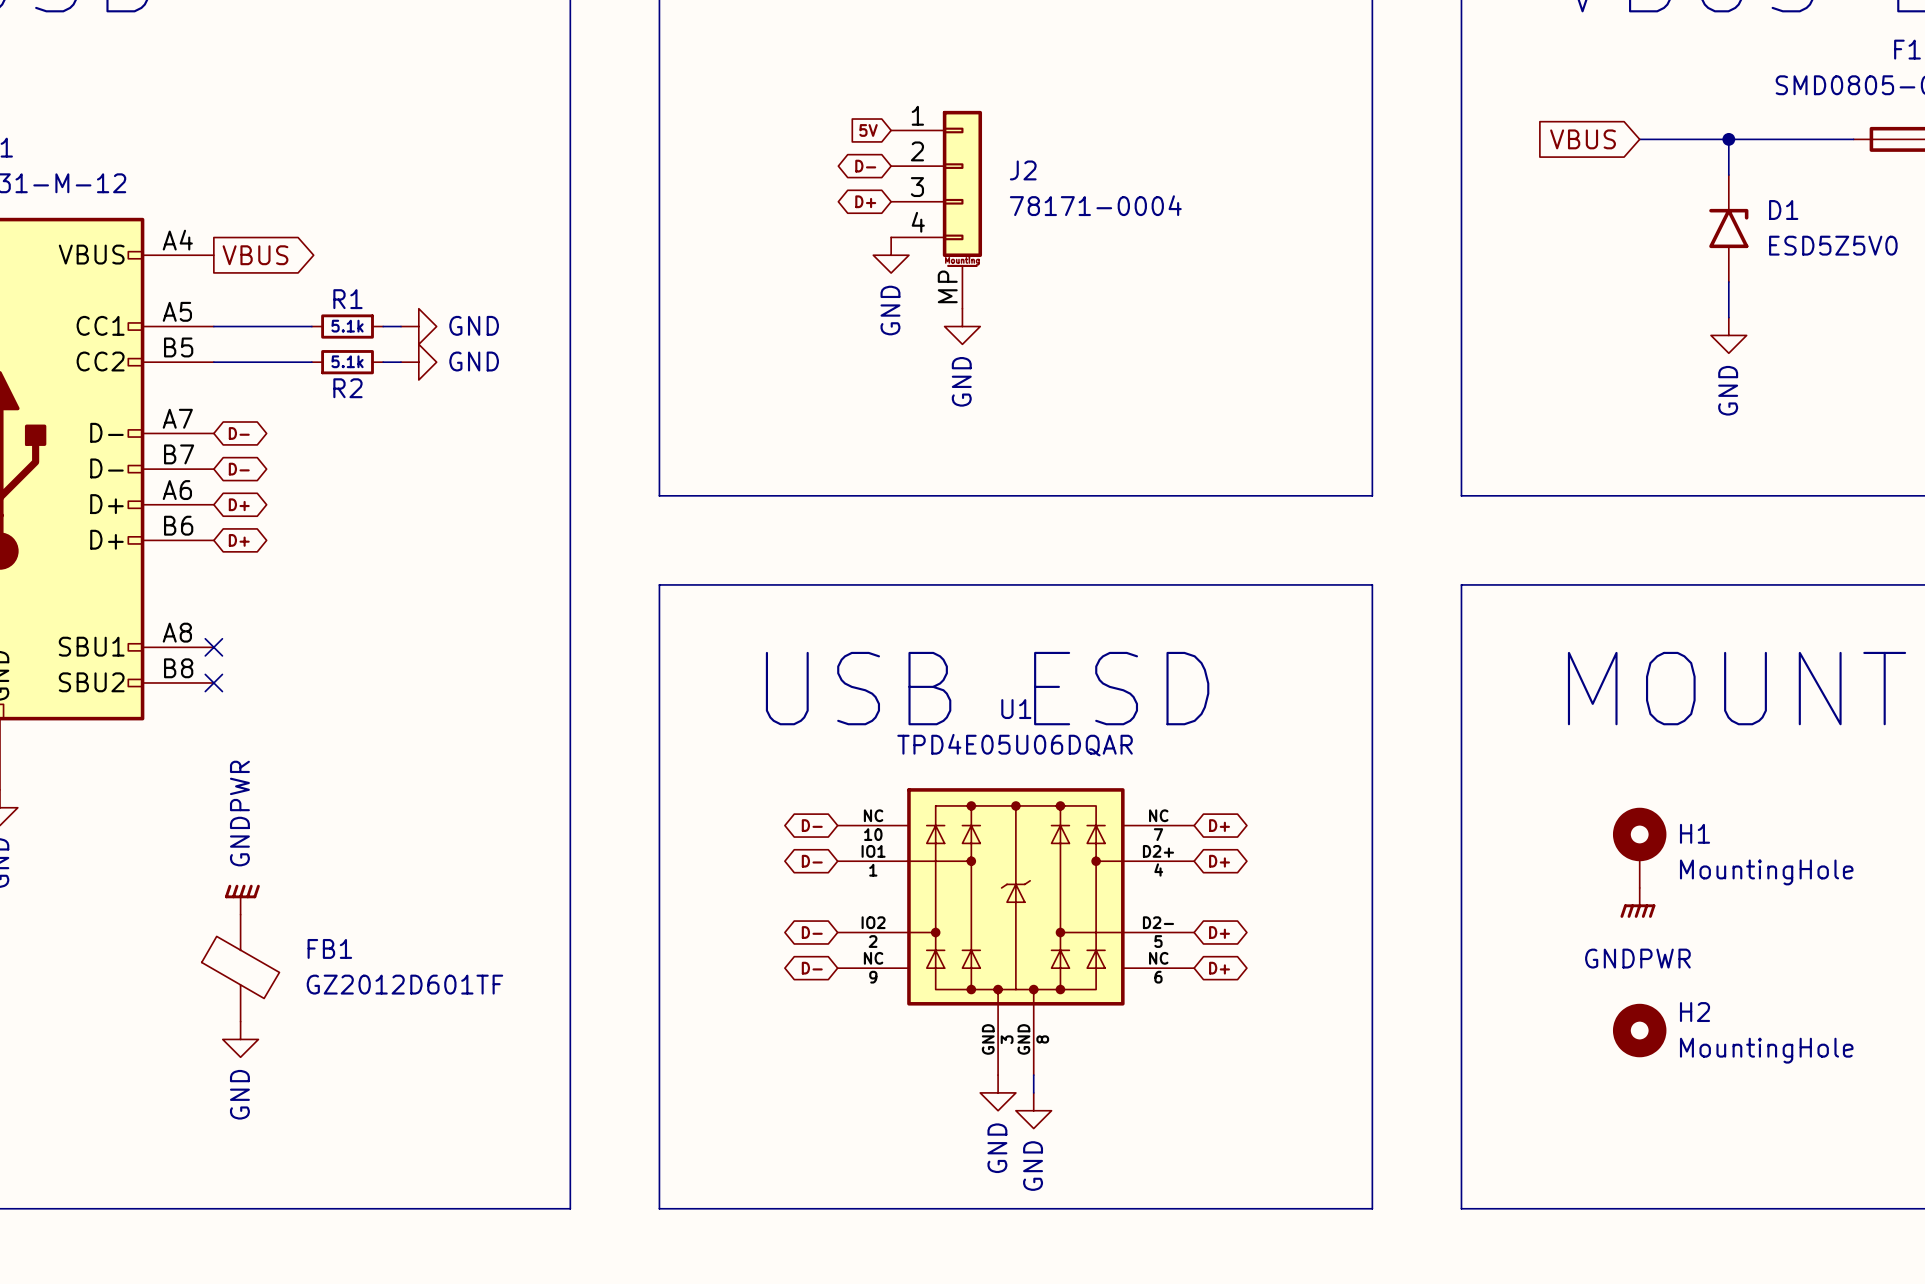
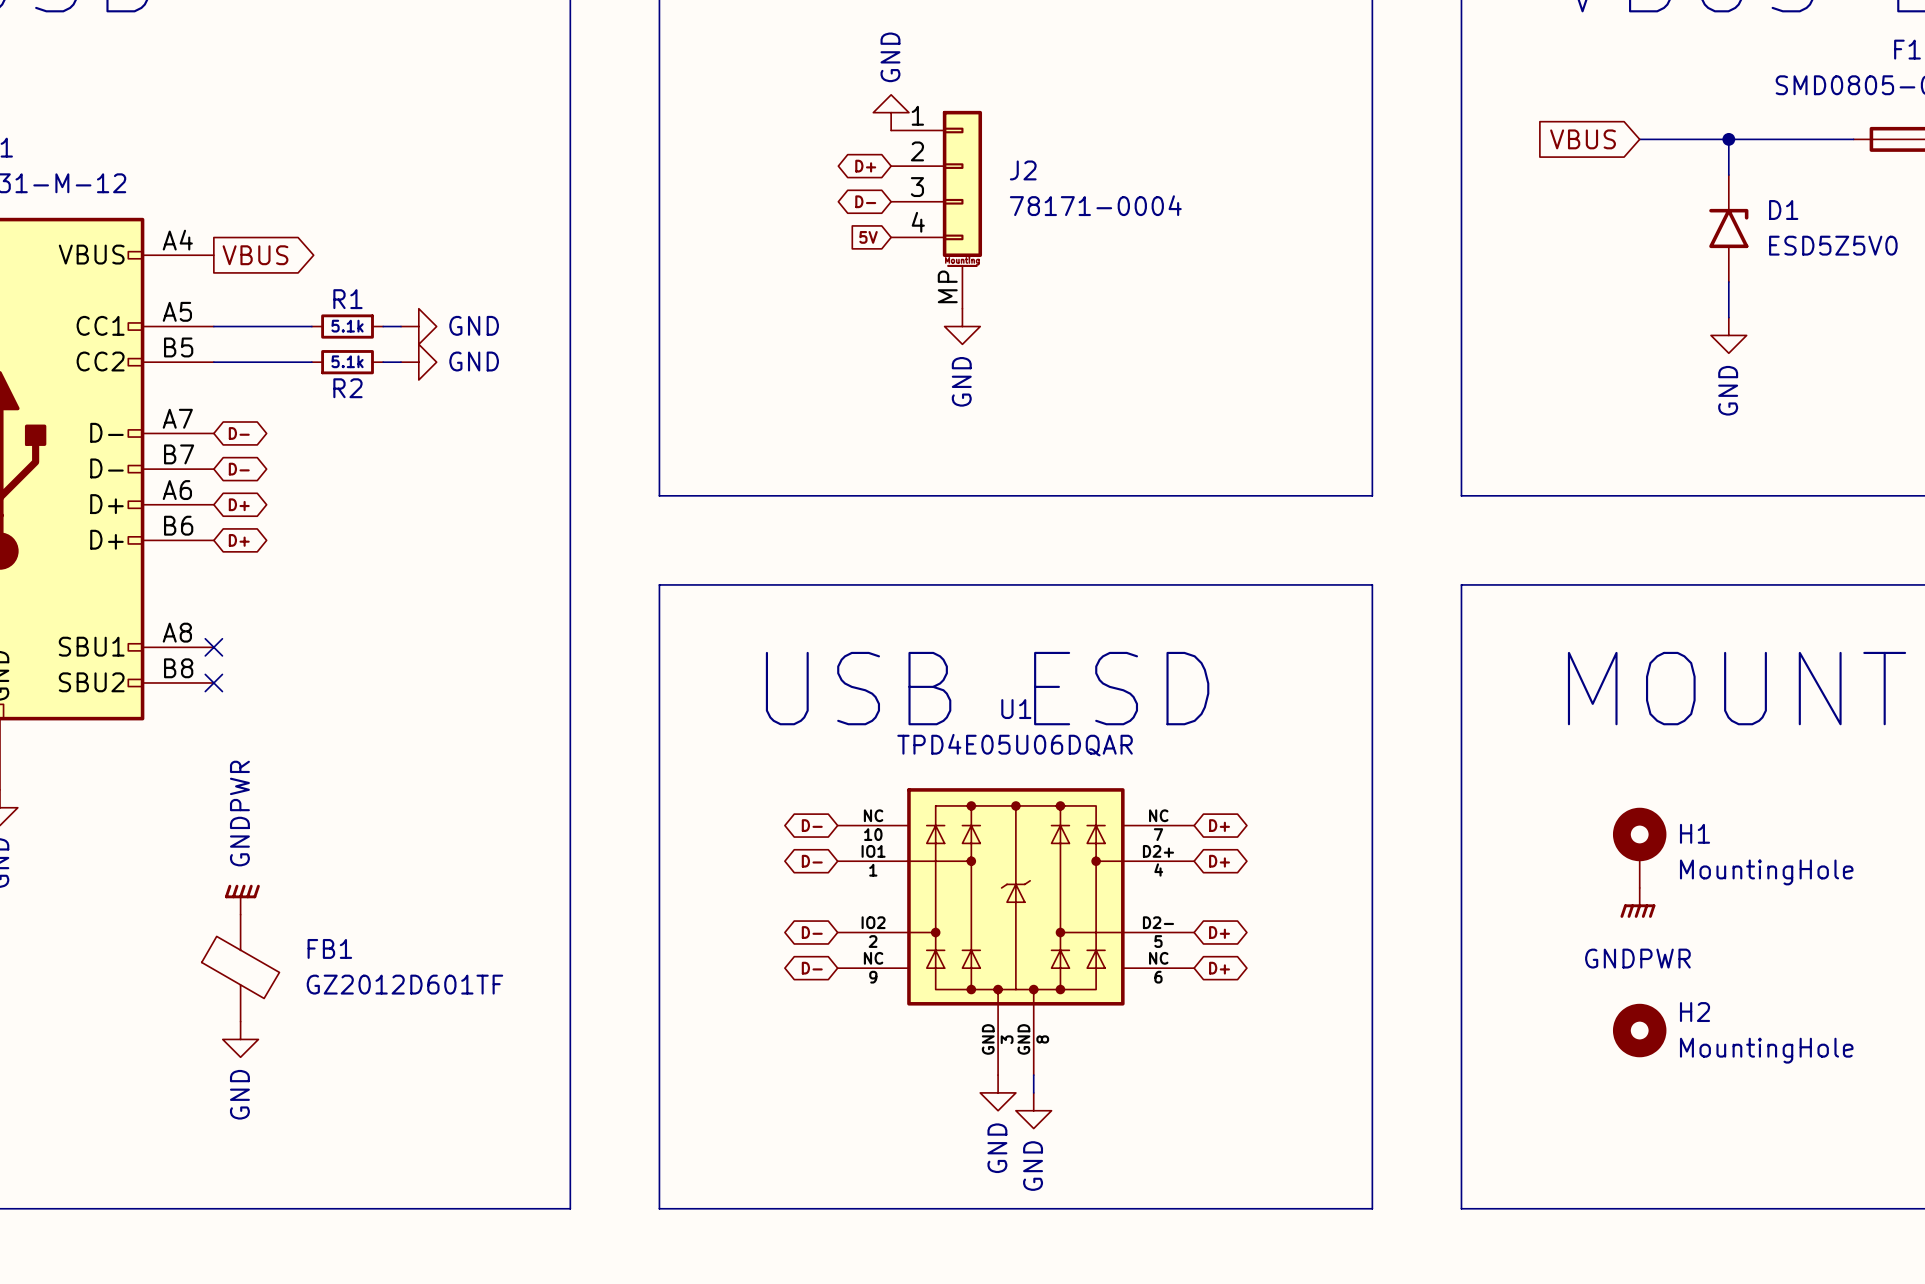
global label position: 5V (868, 130) -> 5V (868, 237)
global label: D- (865, 166) -> D+ (865, 166)
global label: D+ (865, 201) -> D- (865, 201)
power symbol rotation: 0° (891, 255) -> 180° (891, 112)
power symbol position: GND (891, 255) -> GND (891, 112)

